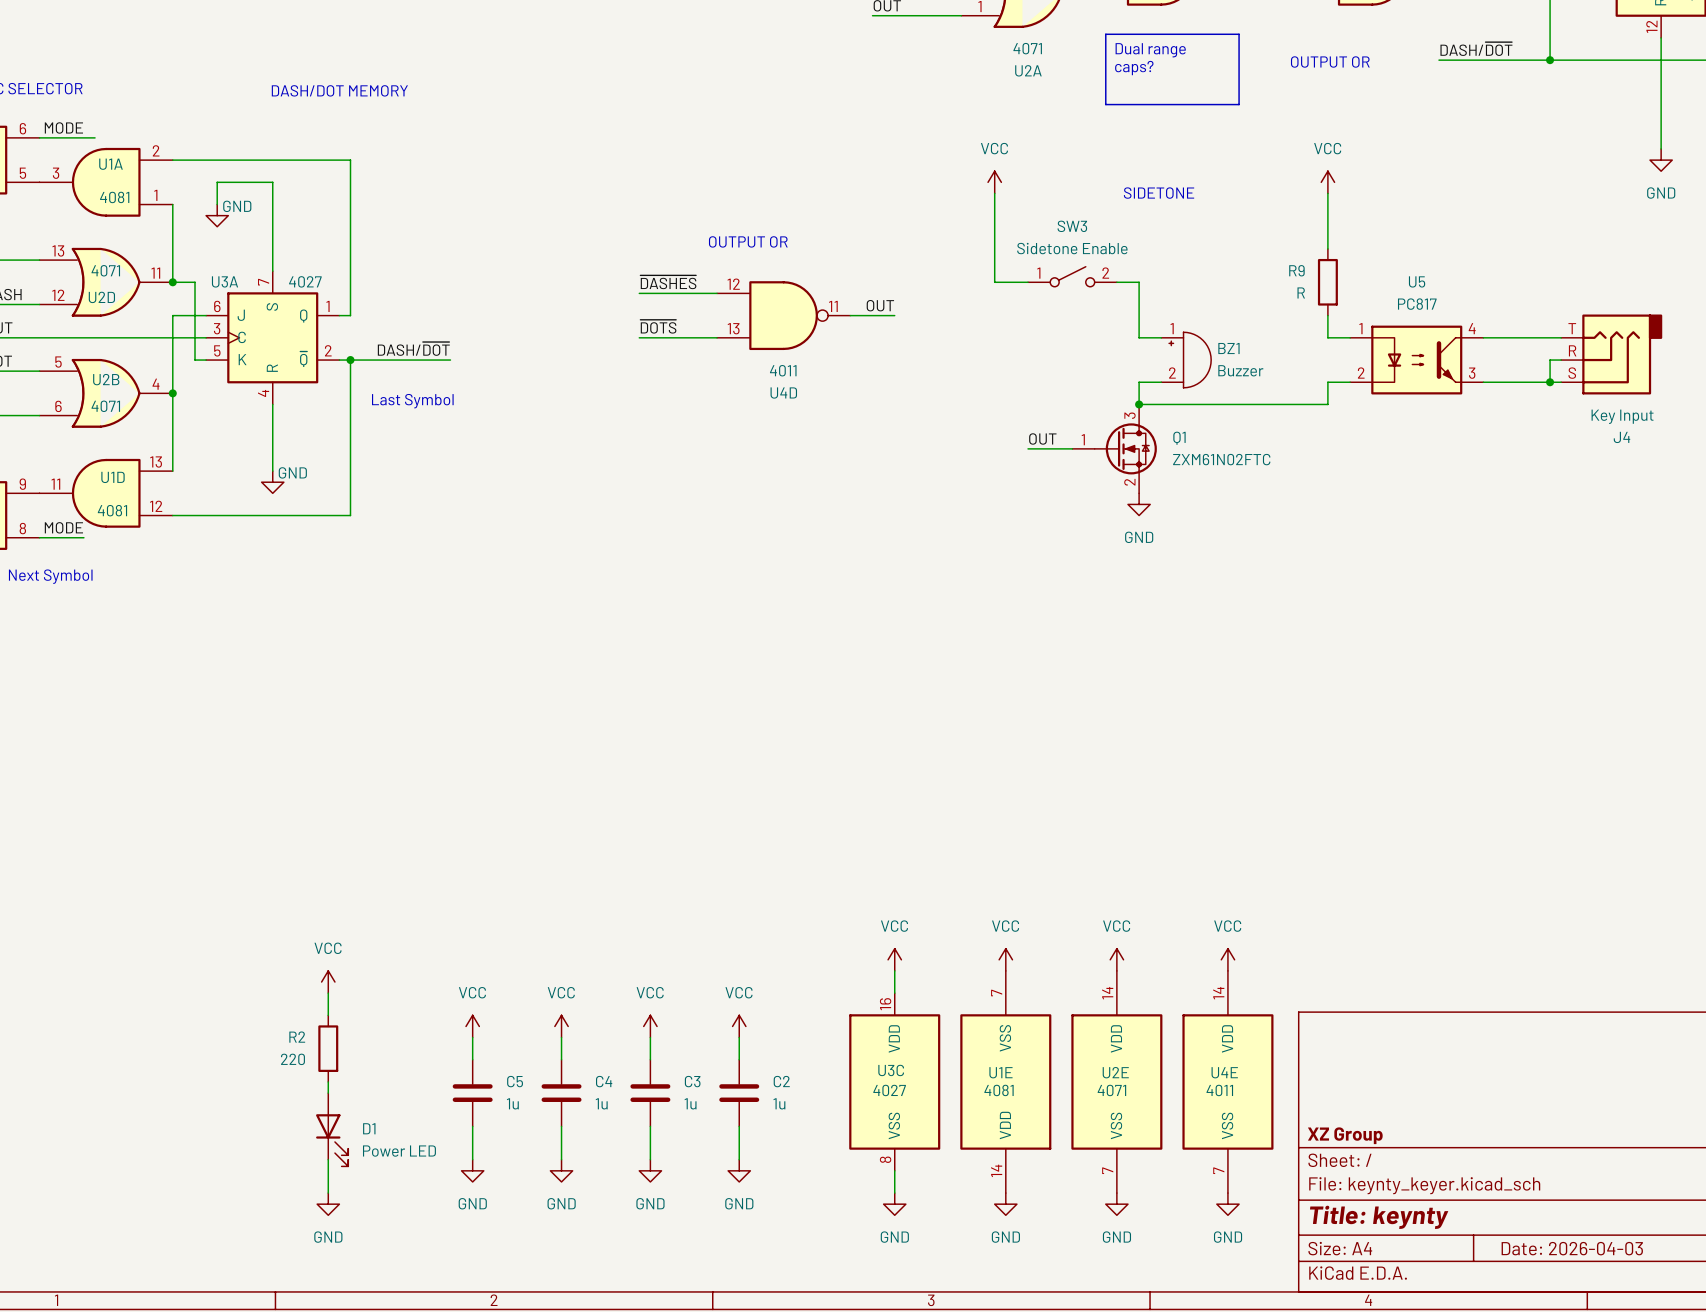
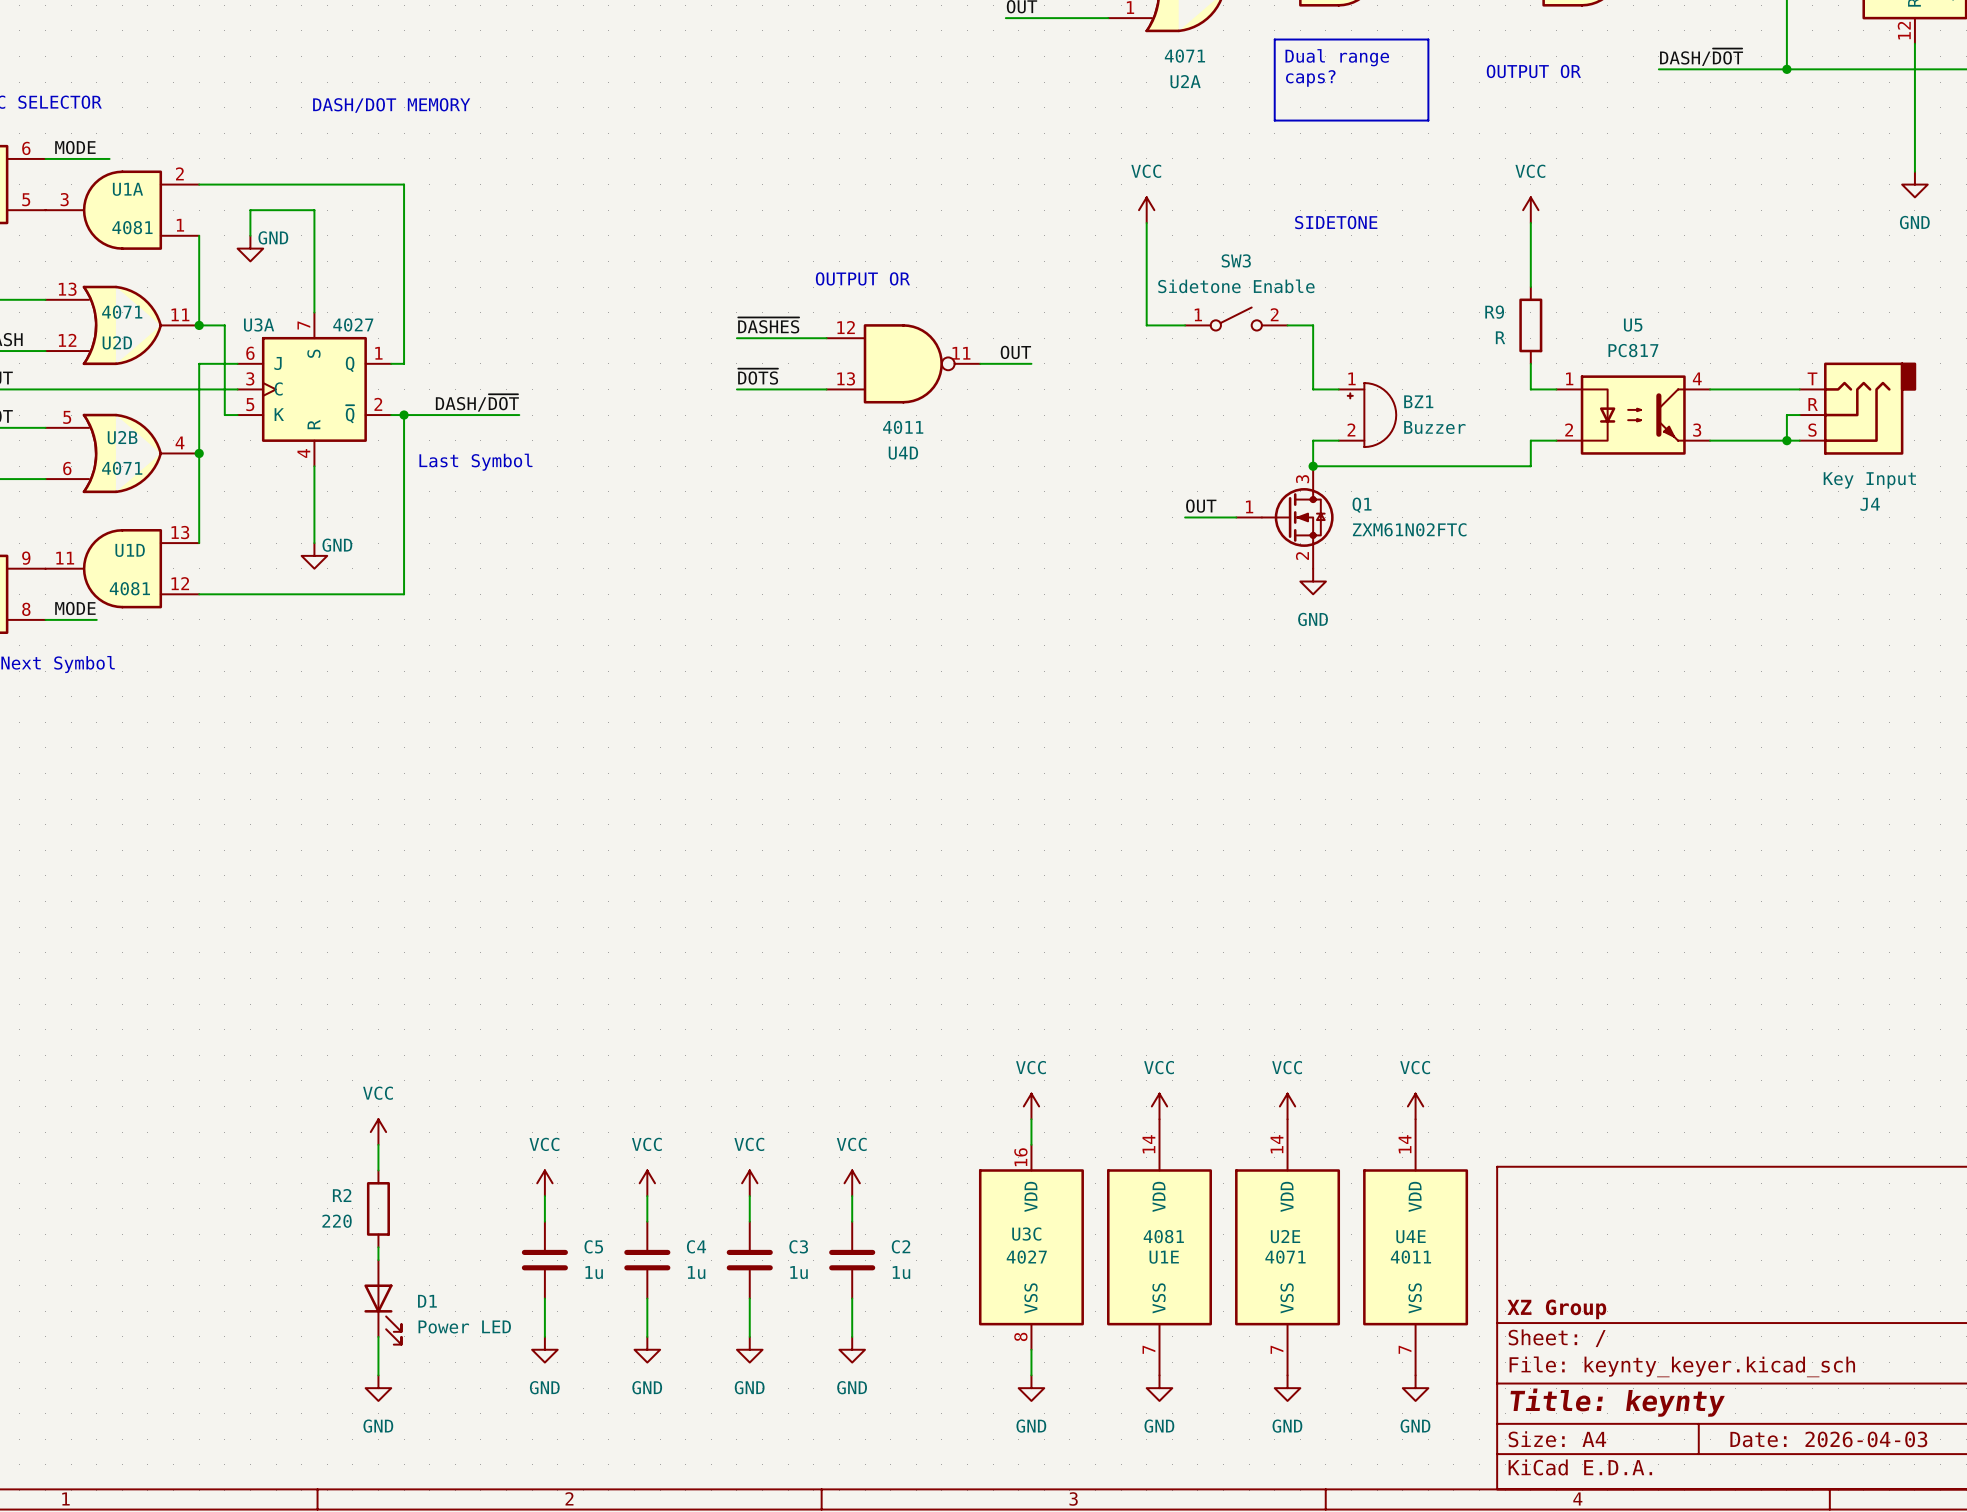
U1E rotation: 0° (1005, 1081) -> 180° (1159, 1247)

